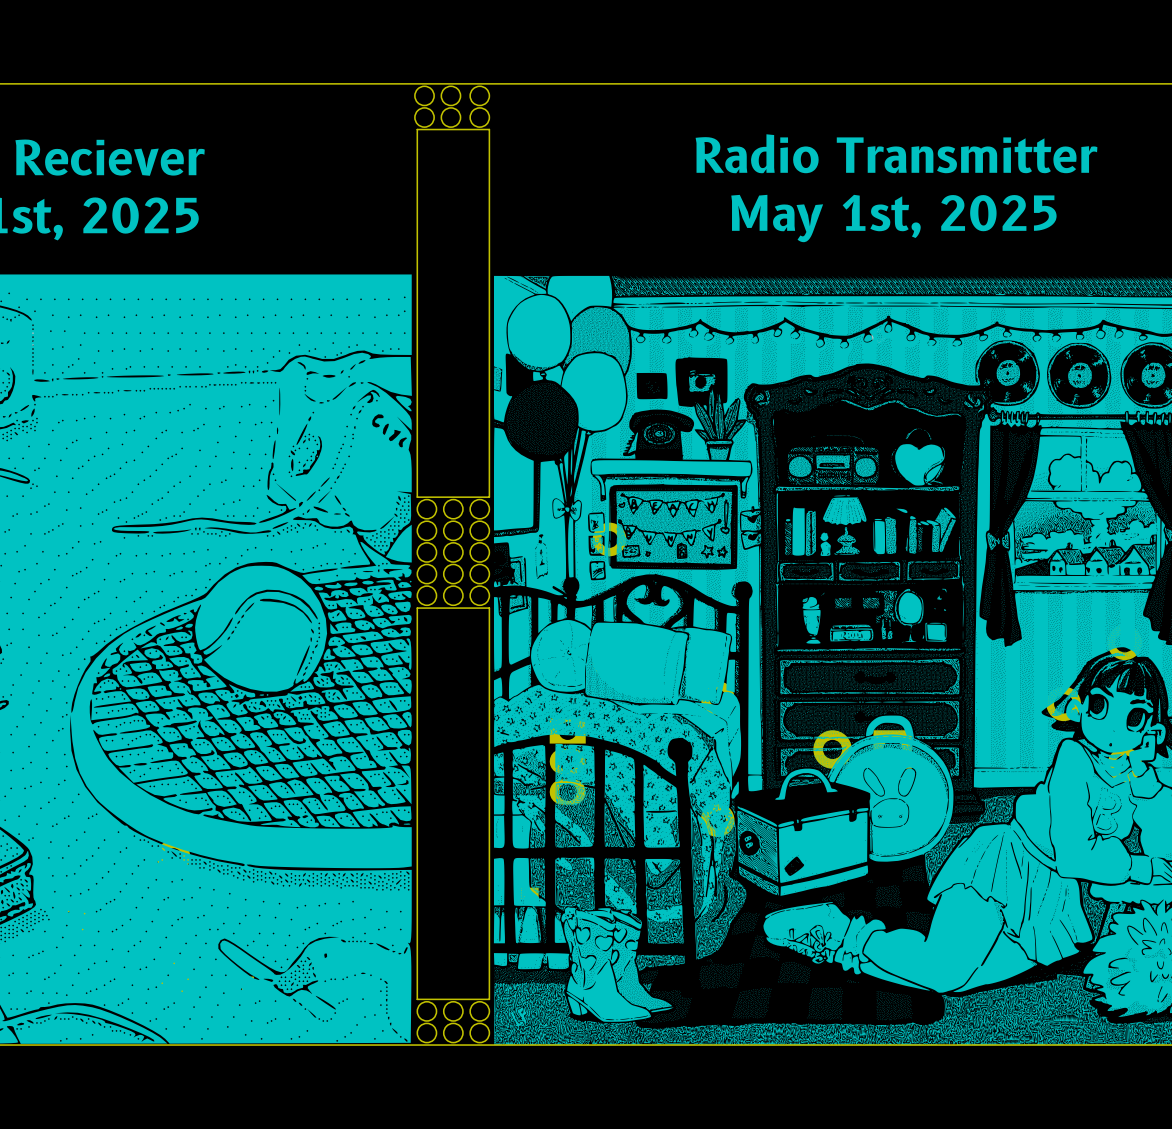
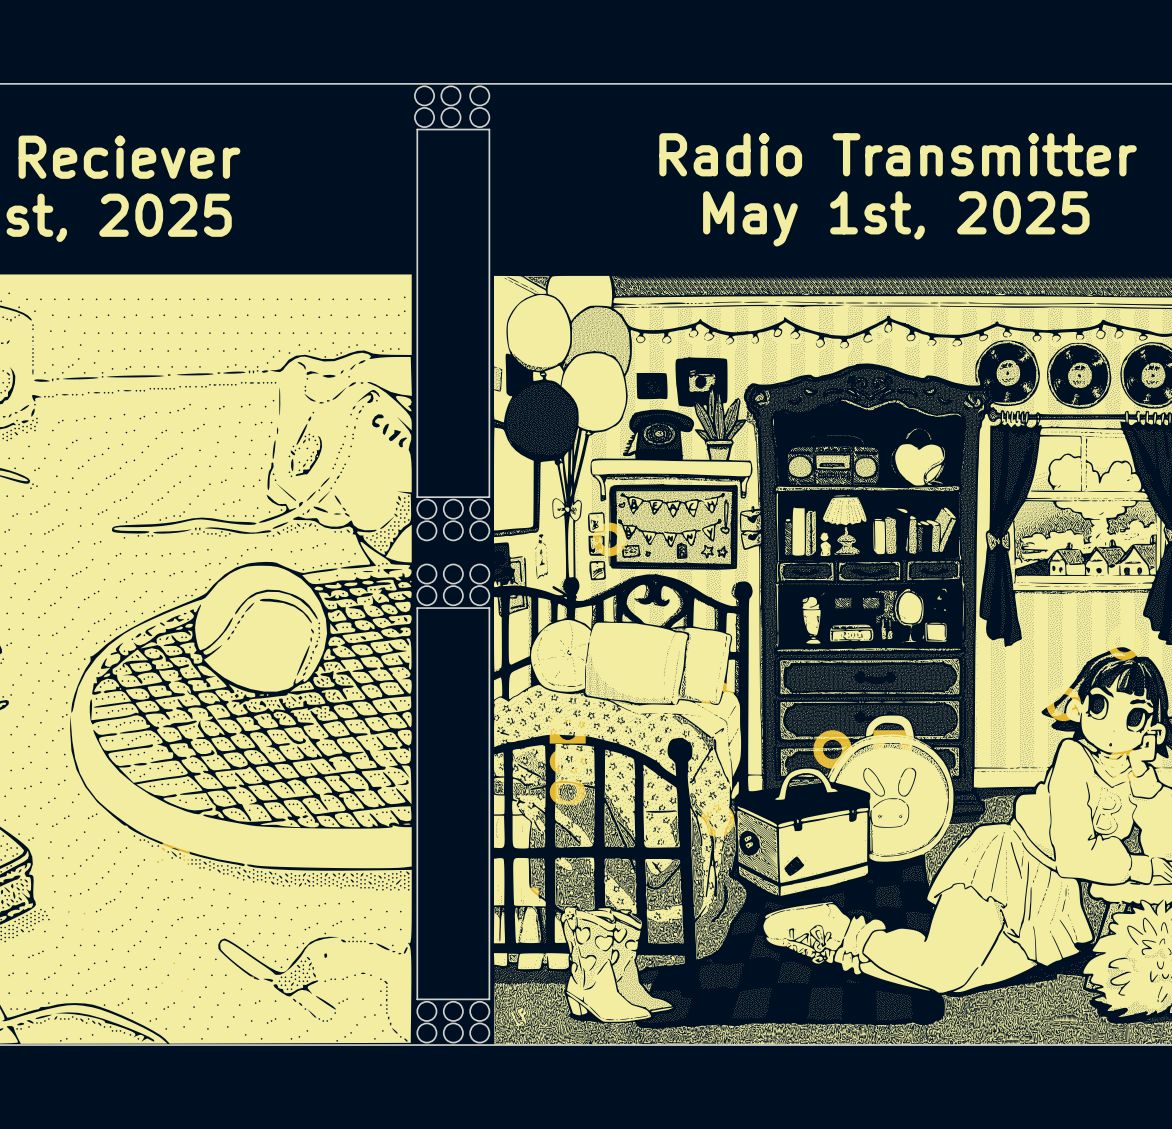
round board edge: [416, 542, 438, 563] -> none
round board edge: [443, 542, 464, 563] -> none
round board edge: [469, 542, 490, 563] -> none

